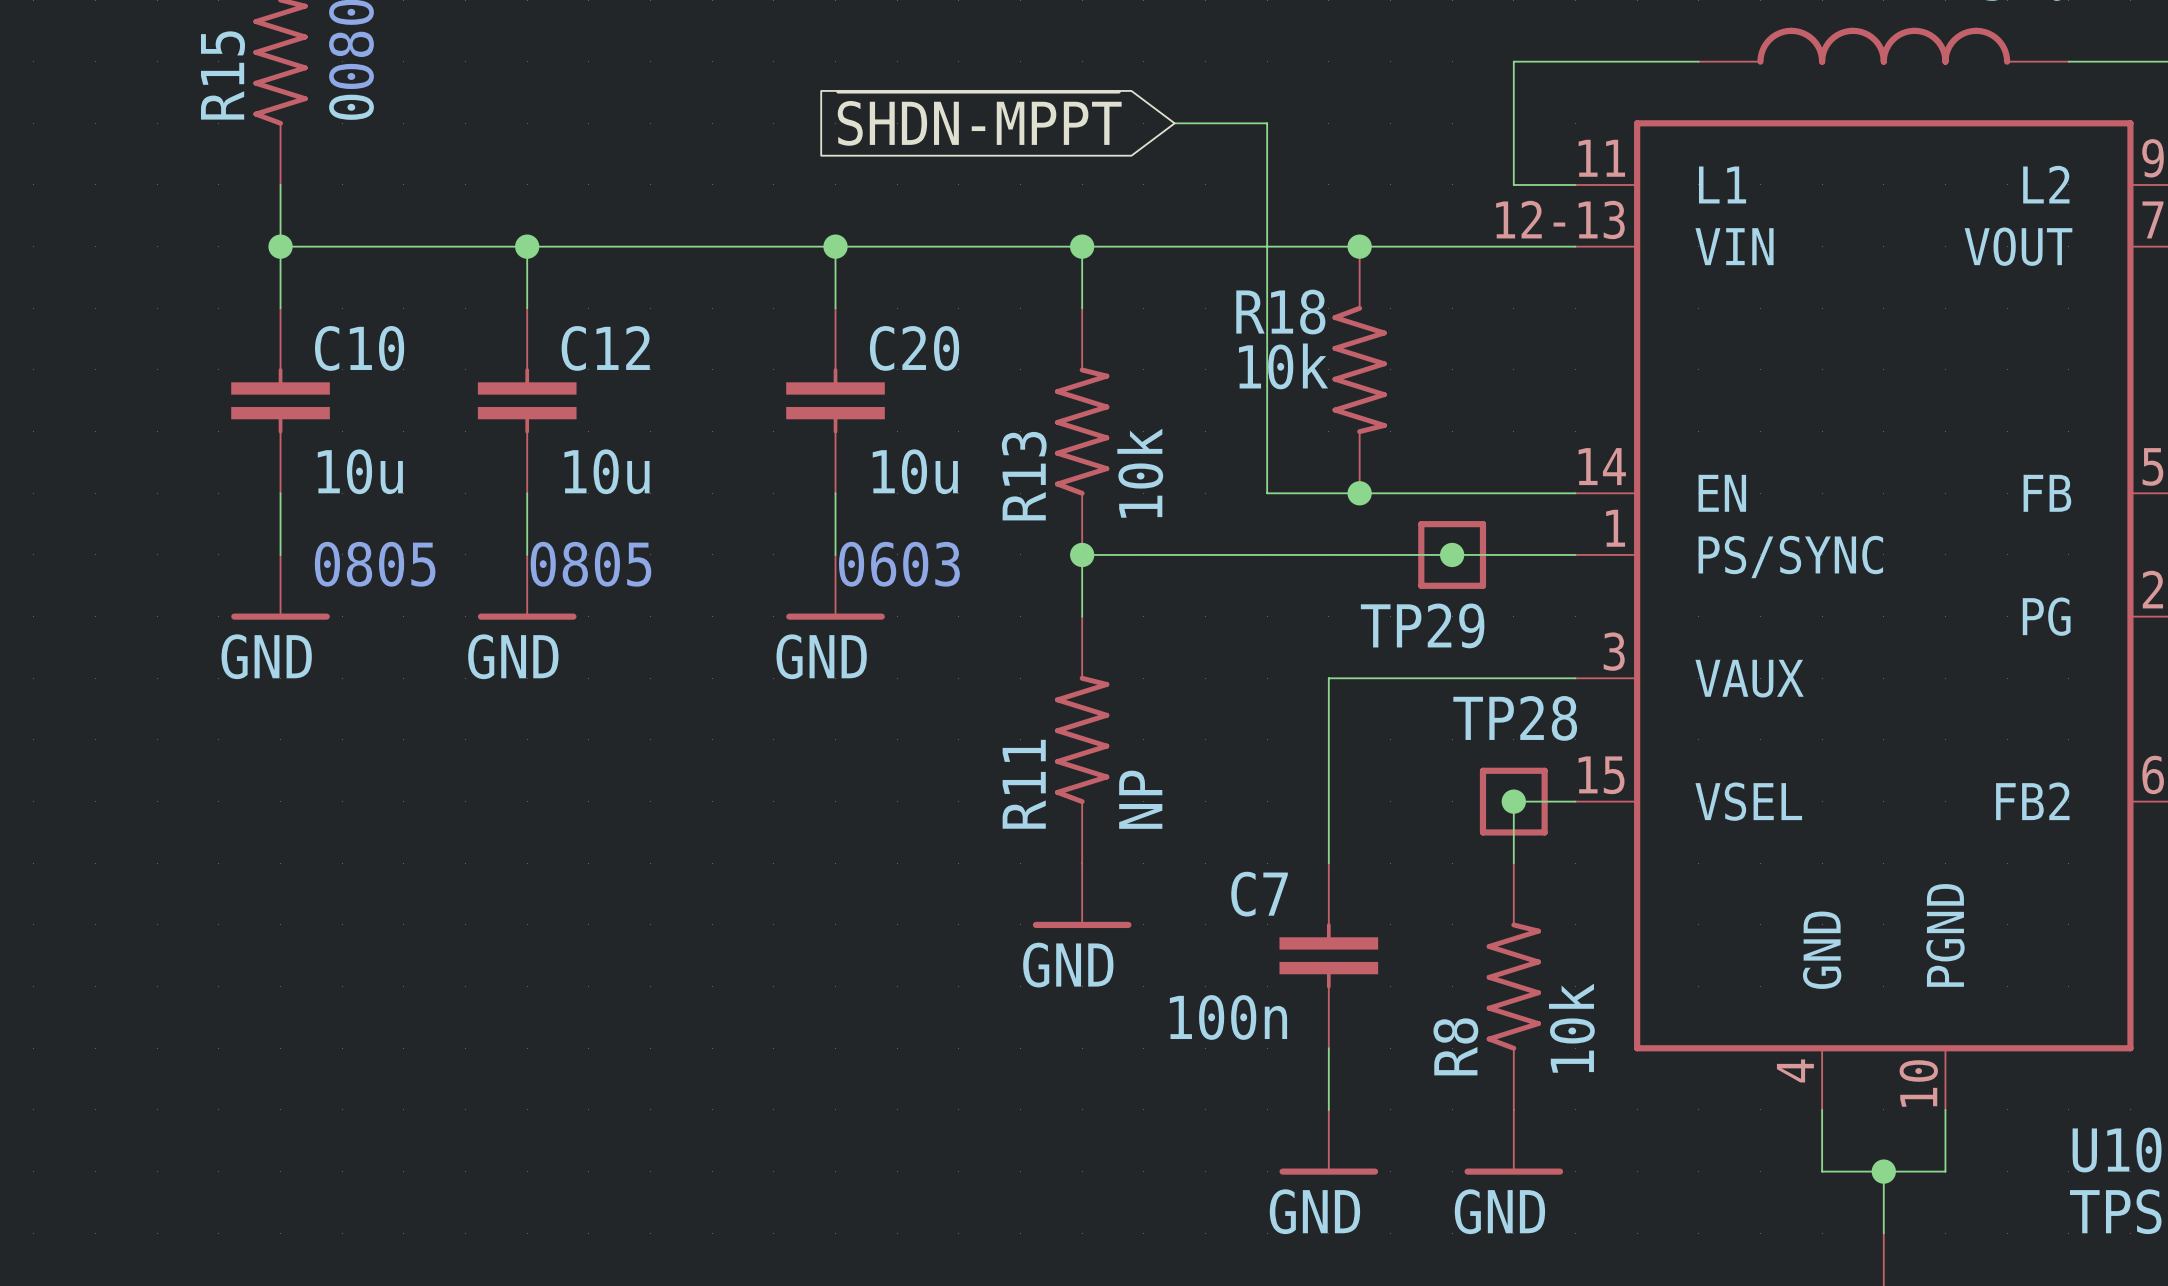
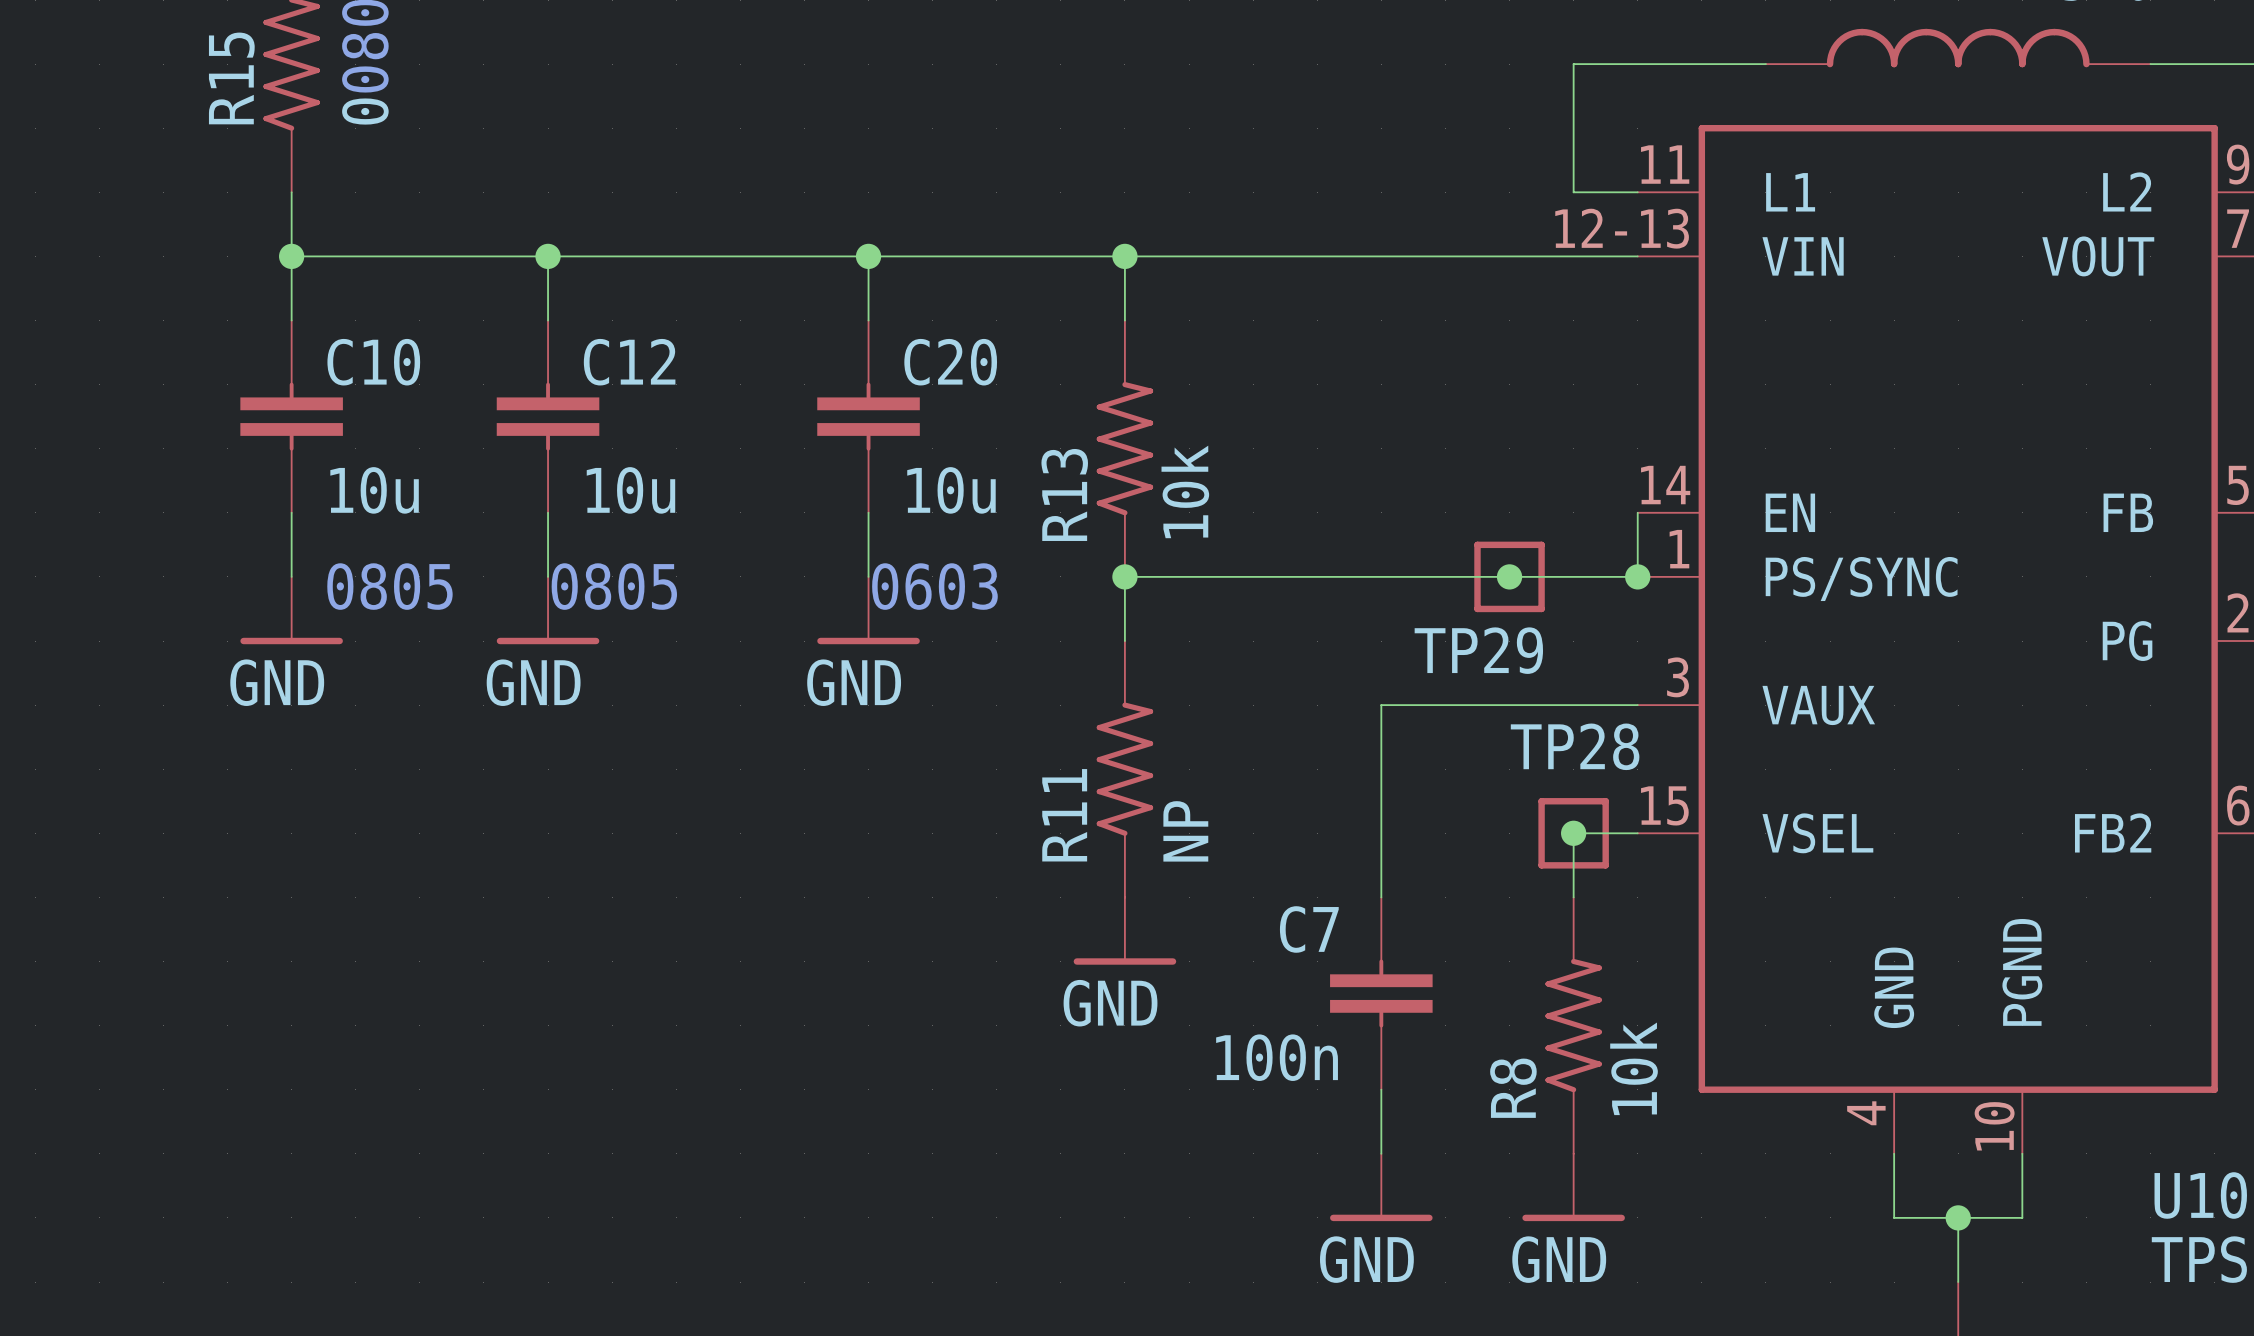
global label: ~{SHDN-MPPT} (979, 118) -> none
wire: (1174, 123) (1267, 123) (1267, 493) (1575, 493) -> (1637, 576) (1637, 512)
junction: (1359, 246) -> none
R18: 10k (1359, 369) -> none
junction: (1359, 493) -> none
junction: none -> (1637, 576)

